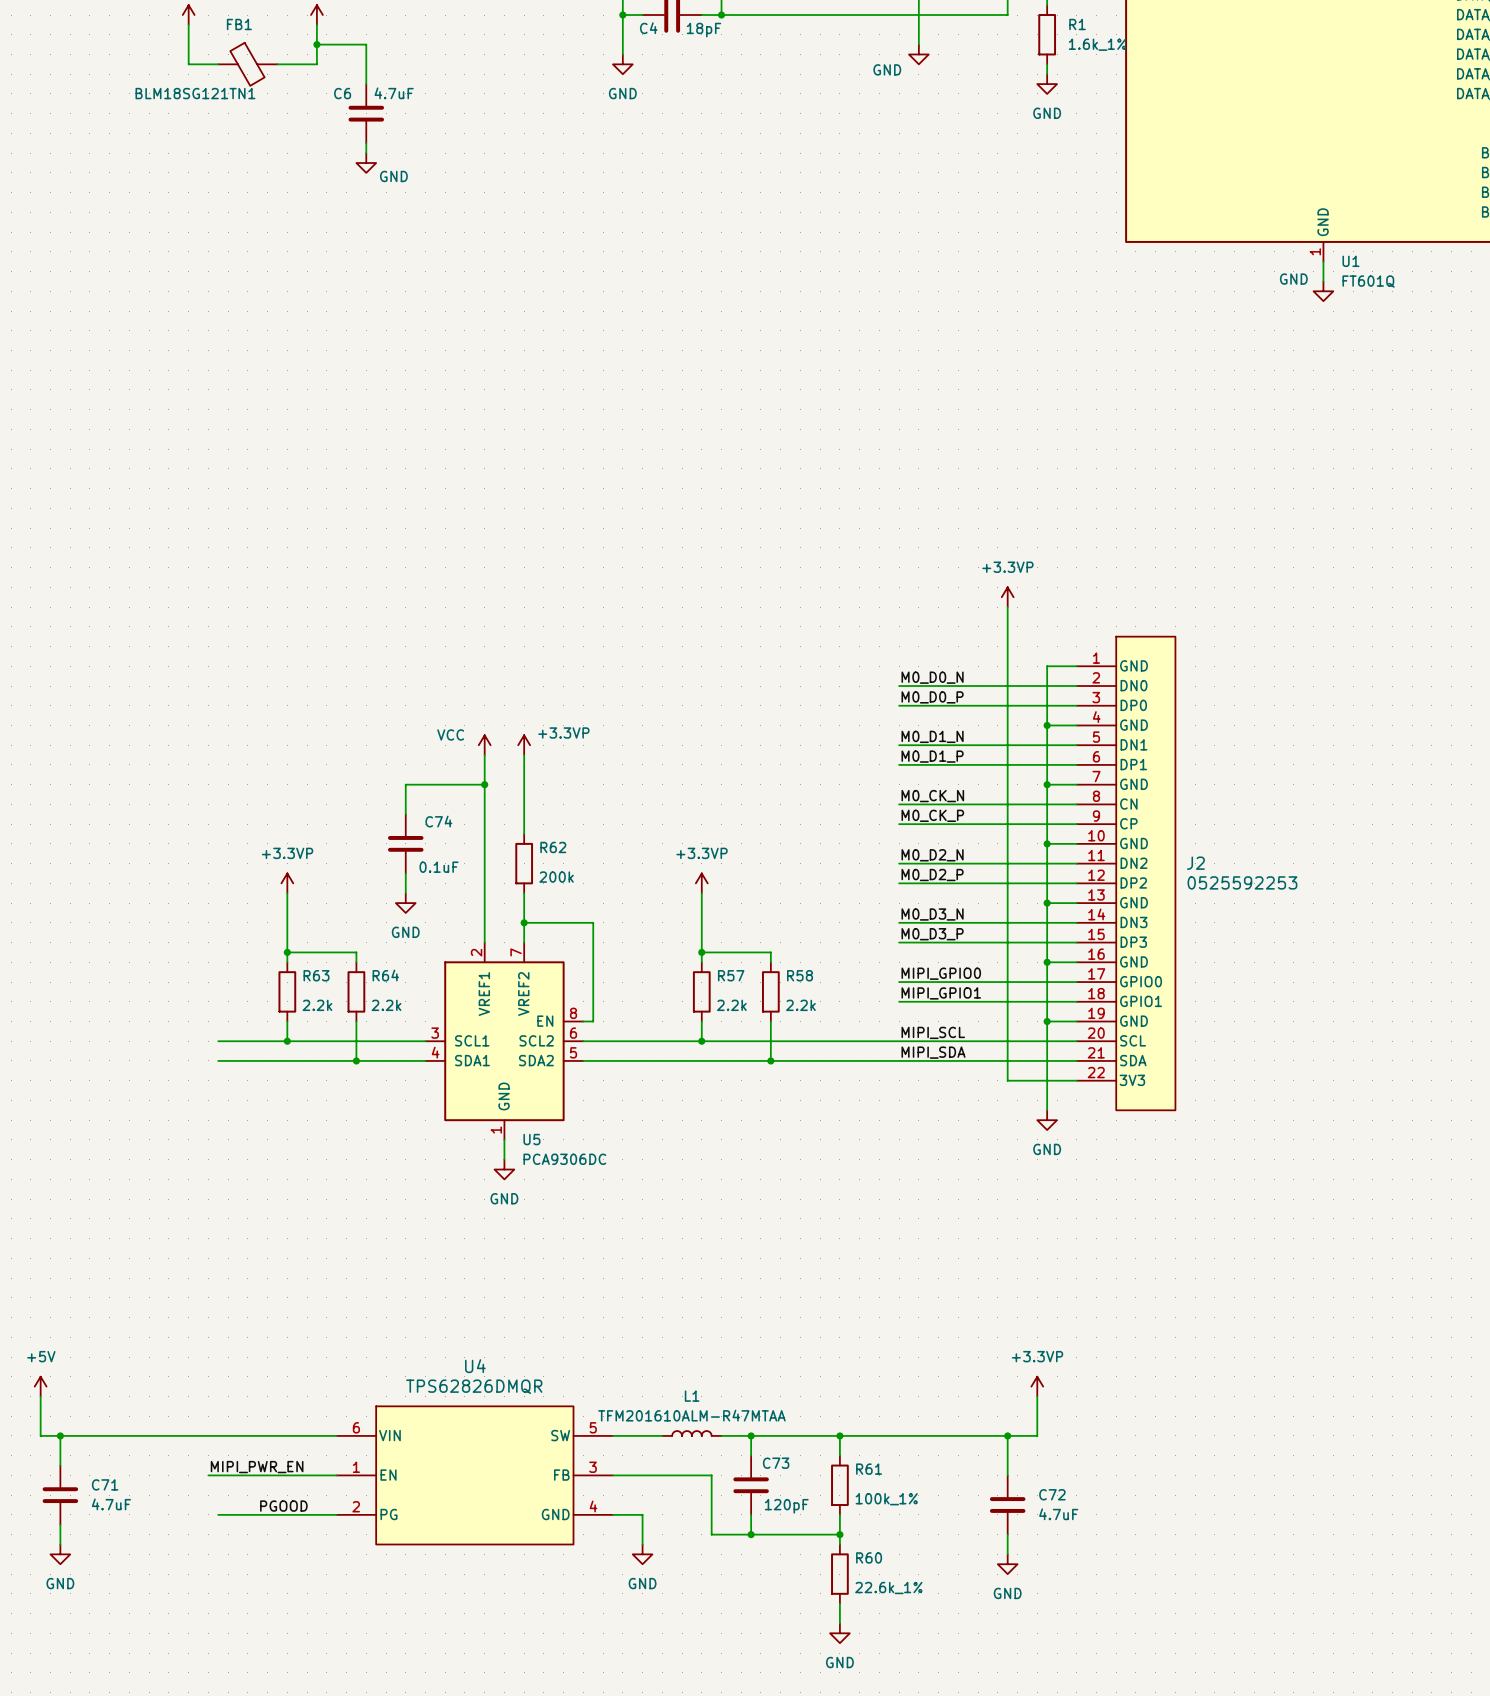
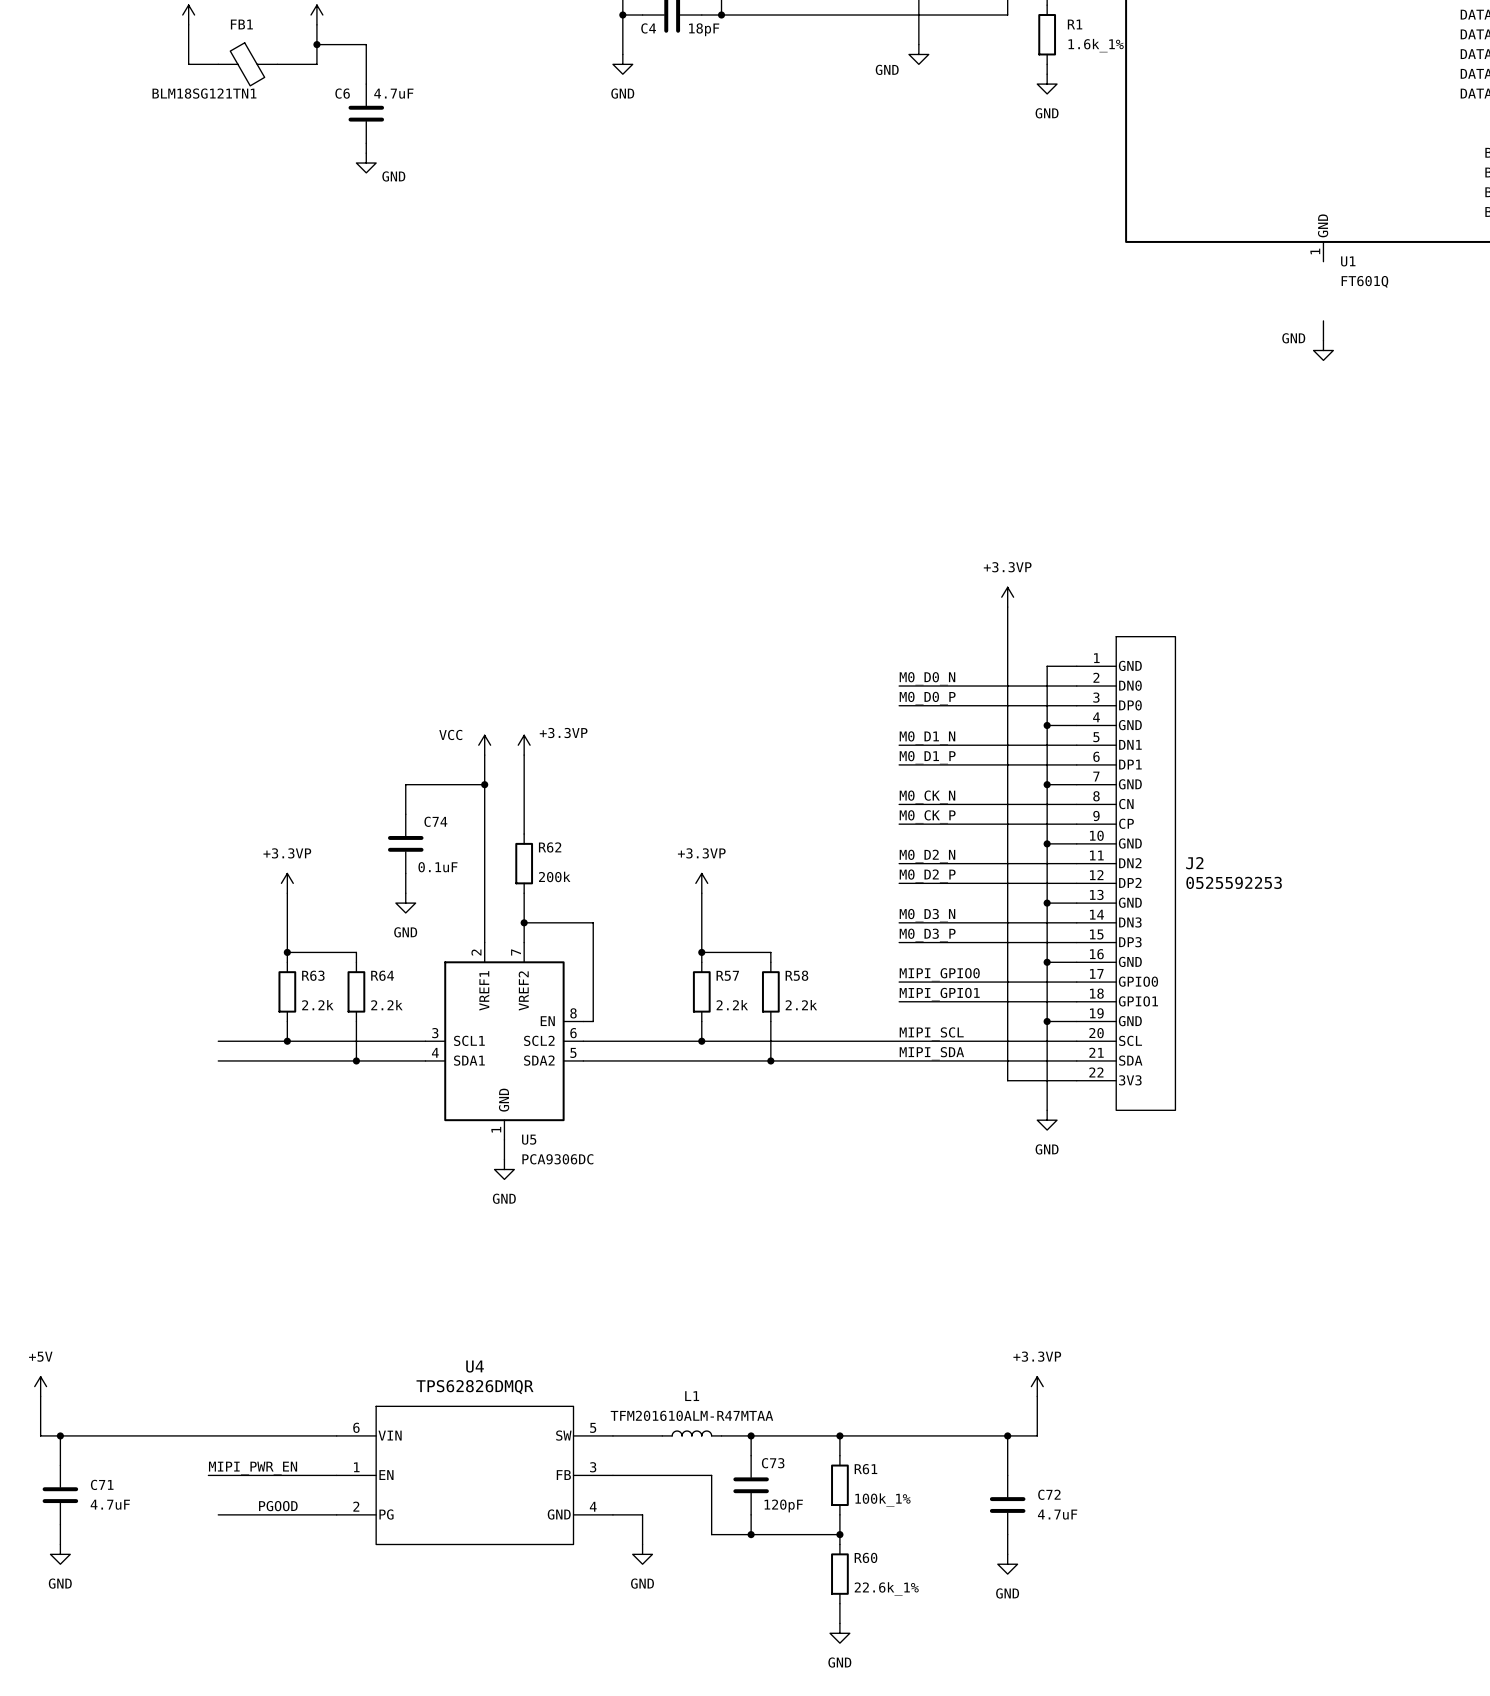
wire: (1323, 261) (1323, 281) -> (1323, 320) (1323, 340)
power symbol position: GND (1323, 291) -> GND (1323, 350)

